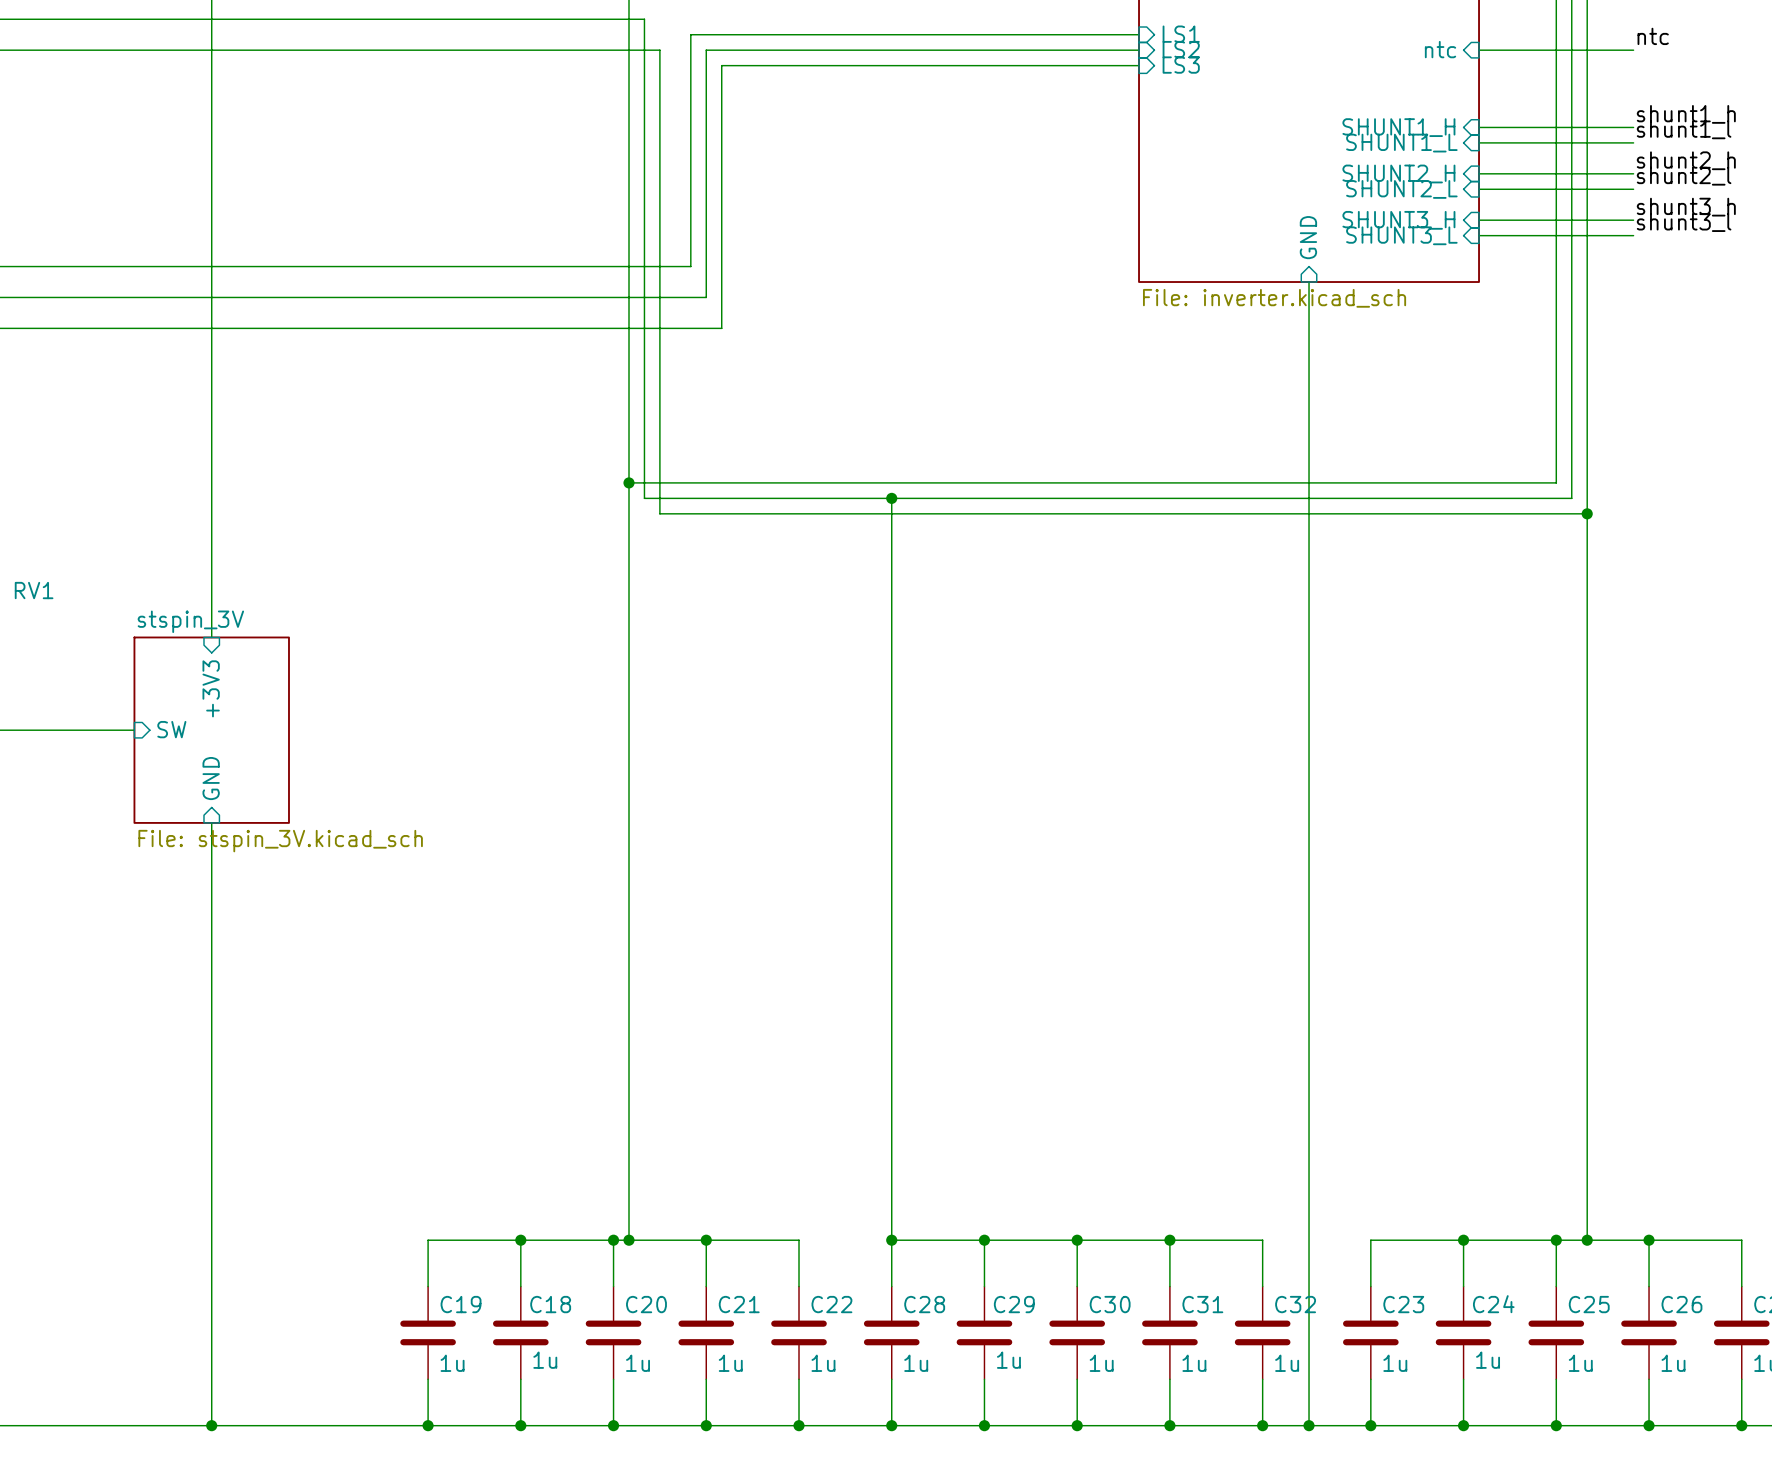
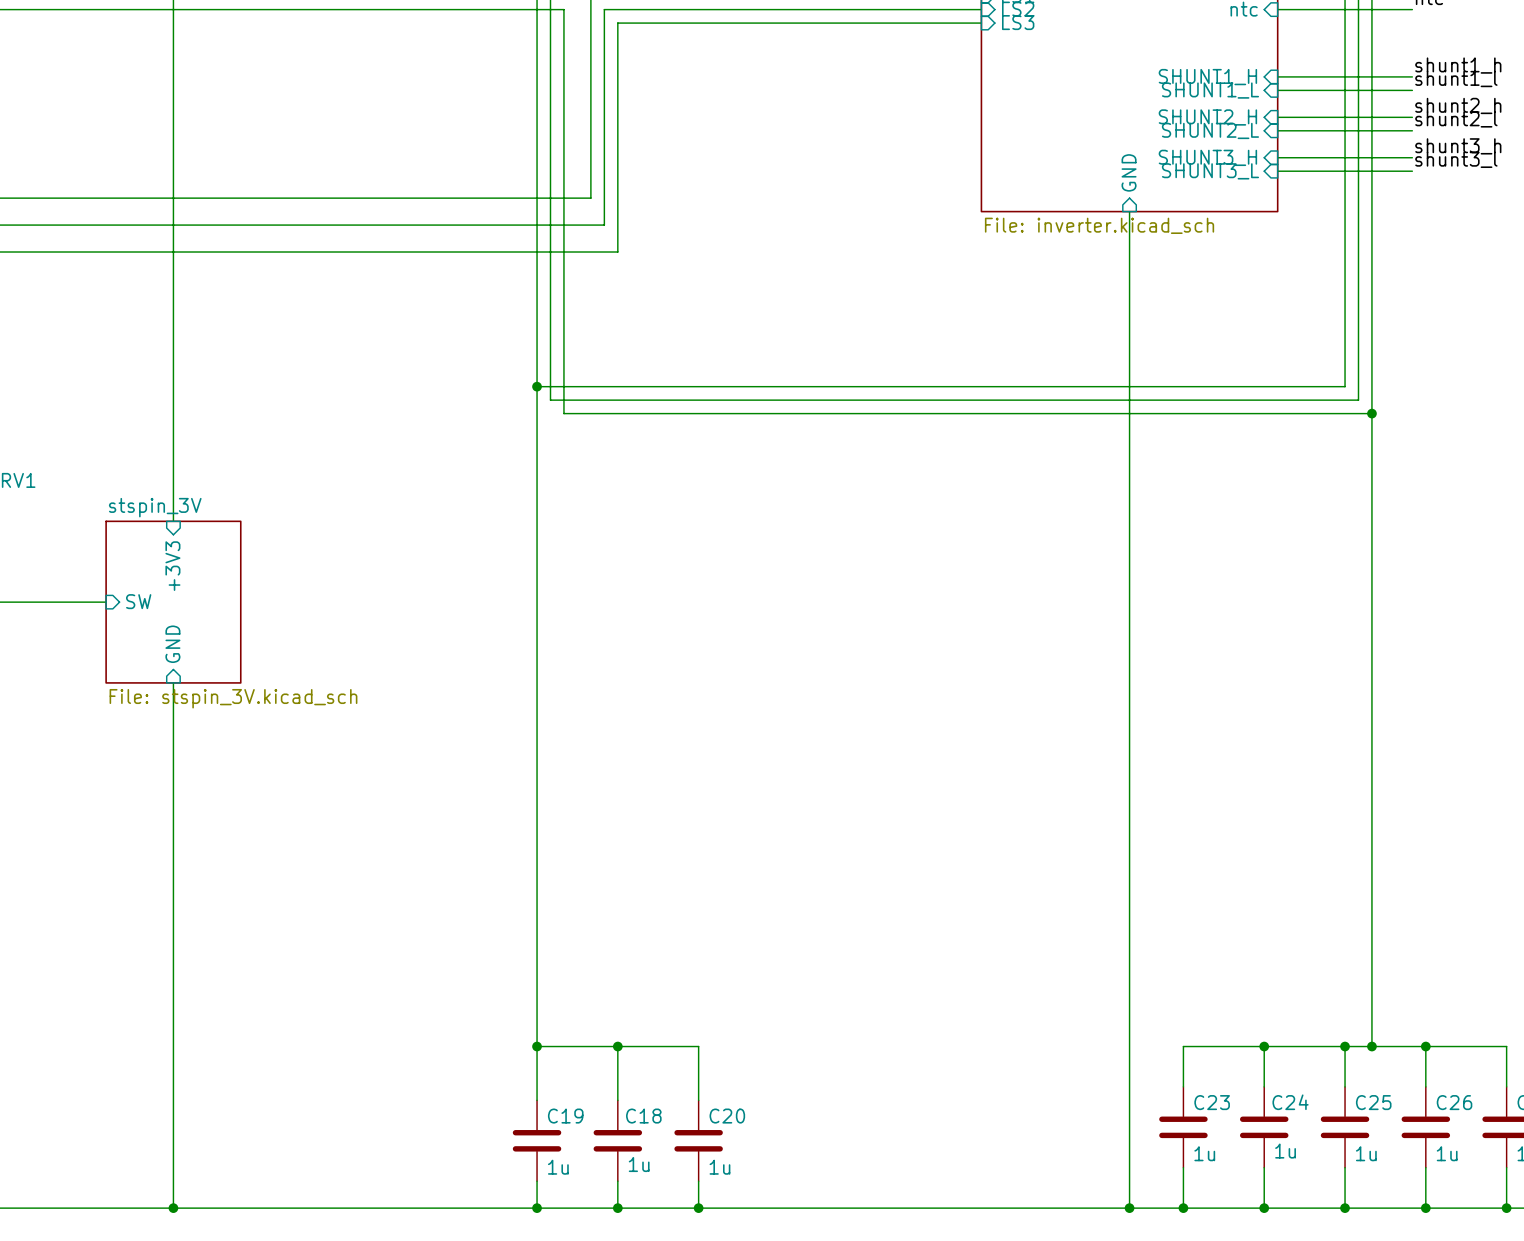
wire: (891, 498) (891, 1286) -> none
junction: (891, 498) -> none
wire: (520, 1240) (520, 1286) -> none
junction: (520, 1240) -> none
wire: (613, 1240) (613, 1286) -> none
junction: (613, 1240) -> none
wire: (629, 1240) (428, 1240) (428, 1286) -> (537, 1046) (537, 1100)
wire: (706, 1240) (706, 1286) -> none
junction position: (706, 1240) -> (617, 1046)
wire: none -> (617, 1046) (617, 1100)
wire: (799, 1240) (799, 1286) -> (685, 1046) (698, 1046) (698, 1100)
wire: (891, 1240) (1262, 1240) (1262, 1286) -> none
junction: (891, 1240) -> none
wire: (984, 1240) (984, 1286) -> none
junction: (984, 1240) -> none
wire: (1077, 1240) (1077, 1286) -> none
junction: (1077, 1240) -> none
wire: (1169, 1240) (1169, 1286) -> none
junction: (1169, 1240) -> none
C19 position: (428, 1332) -> (537, 1140)
C18 position: (520, 1332) -> (617, 1140)
C20 position: (613, 1332) -> (698, 1140)
C21: 1u (706, 1332) -> none
C22: 1u (799, 1332) -> none
C28: 1u (891, 1332) -> none
C29: 1u (984, 1332) -> none
C30: 1u (1077, 1332) -> none
C31: 1u (1169, 1332) -> none
C32: 1u (1262, 1332) -> none
wire: (428, 1379) (428, 1425) -> none
wire: (520, 1379) (520, 1425) -> none
wire: (613, 1379) (613, 1425) -> none
wire: (706, 1379) (706, 1425) -> none
wire: (799, 1379) (799, 1425) -> none
wire: (891, 1379) (891, 1425) -> none
wire: (984, 1379) (984, 1425) -> none
wire: (1077, 1379) (1077, 1425) -> none
wire: (1169, 1379) (1169, 1425) -> none
wire: (1262, 1379) (1262, 1425) -> none
wire: none -> (537, 1181) (537, 1208)
wire: none -> (617, 1181) (617, 1208)
wire: none -> (698, 1181) (698, 1208)
junction: (428, 1425) -> none
junction: (520, 1425) -> none
junction position: (613, 1425) -> (537, 1208)
junction position: (706, 1425) -> (617, 1208)
junction position: (799, 1425) -> (698, 1208)
junction: (891, 1425) -> none
junction: (984, 1425) -> none
junction: (1077, 1425) -> none
junction: (1169, 1425) -> none
junction: (1262, 1425) -> none

